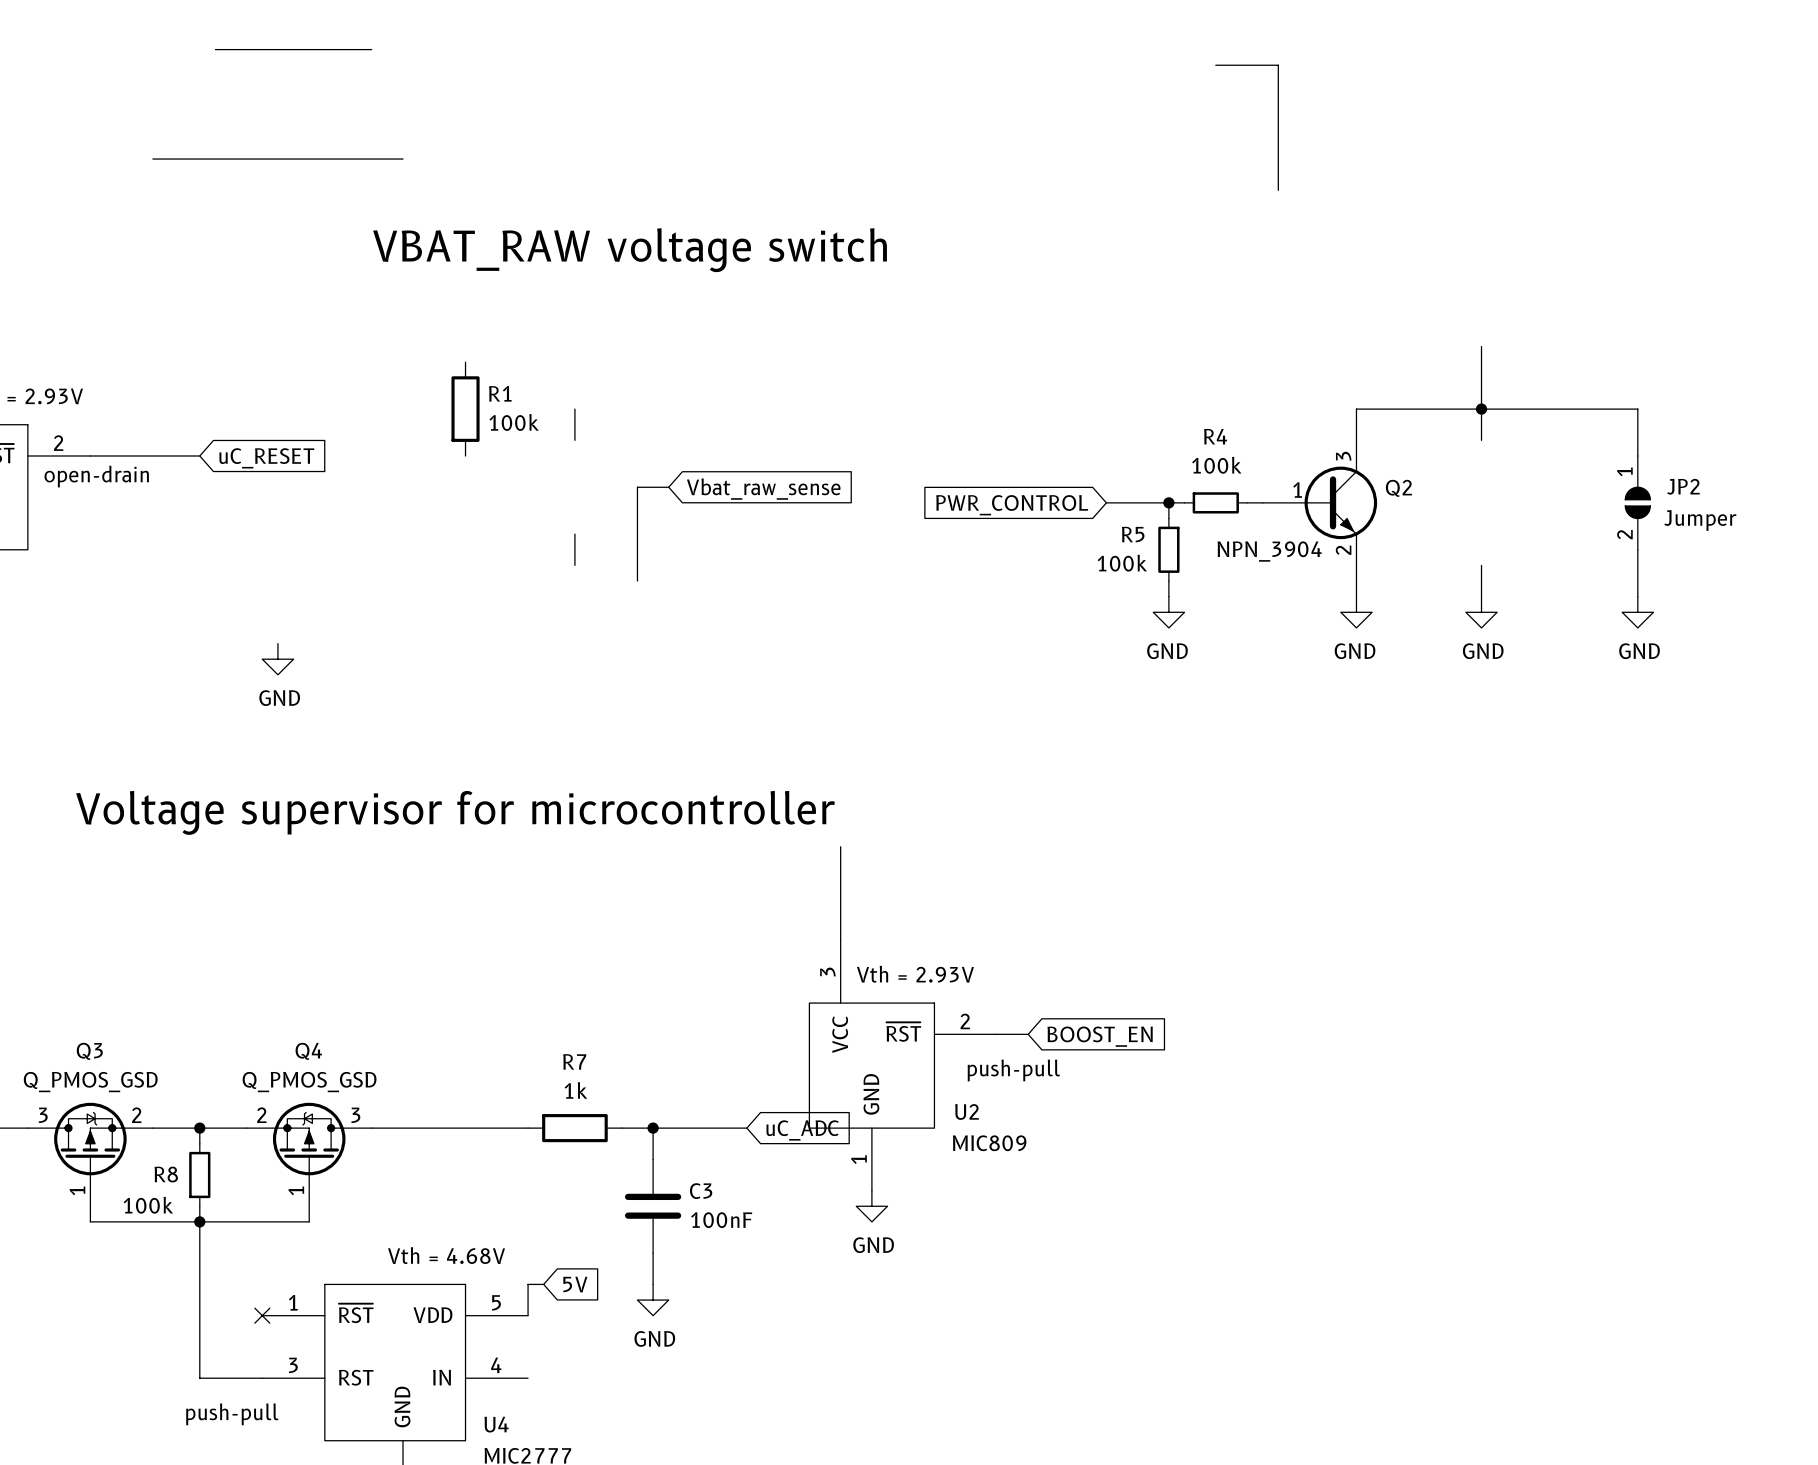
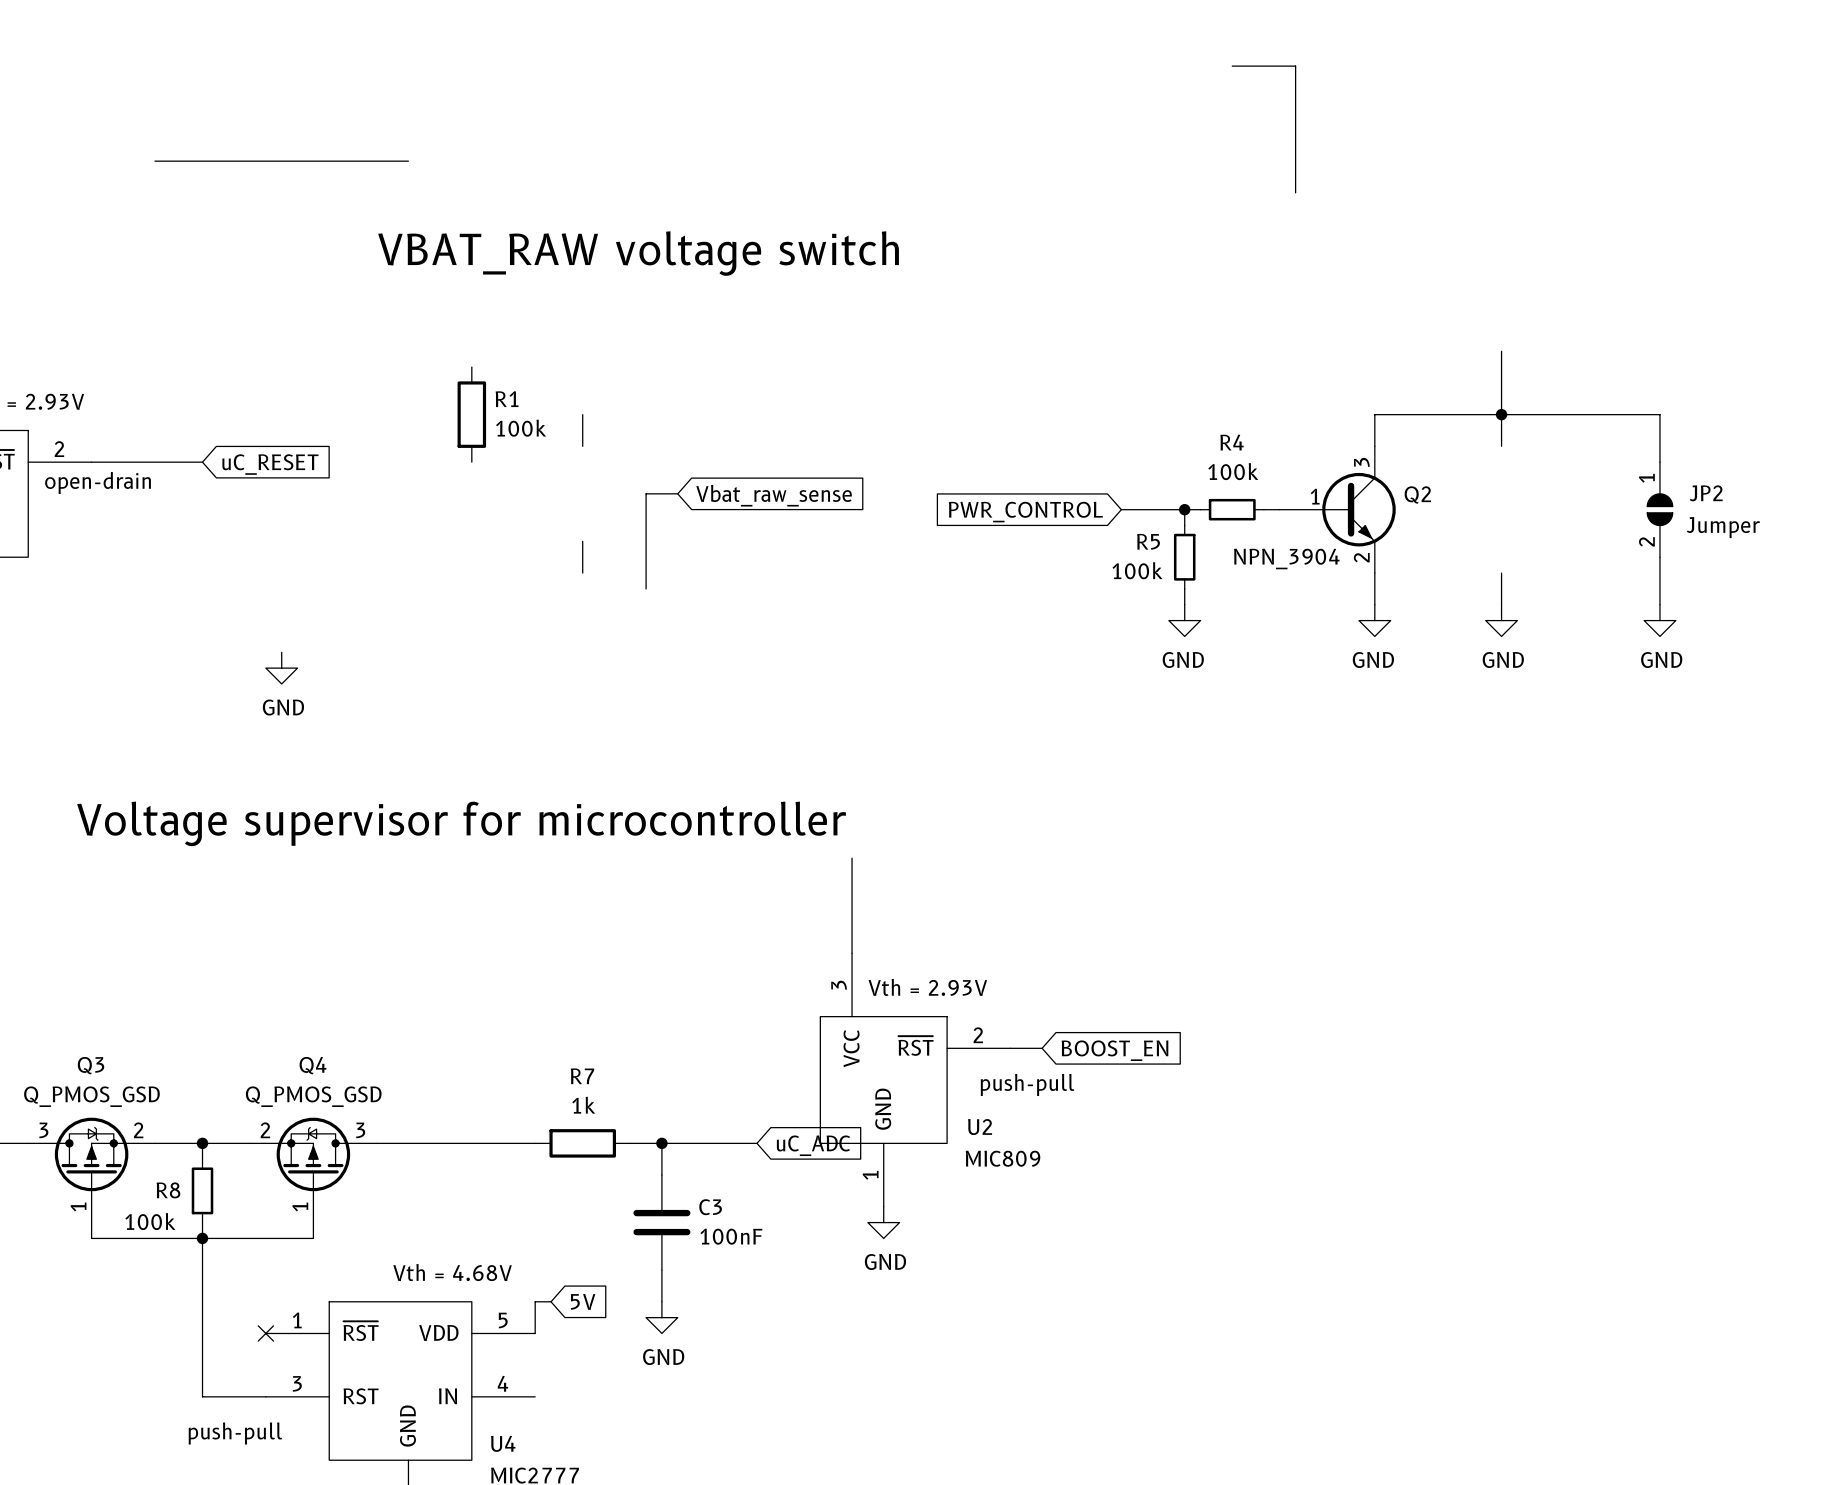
wire: (215, 49) (371, 49) -> none

